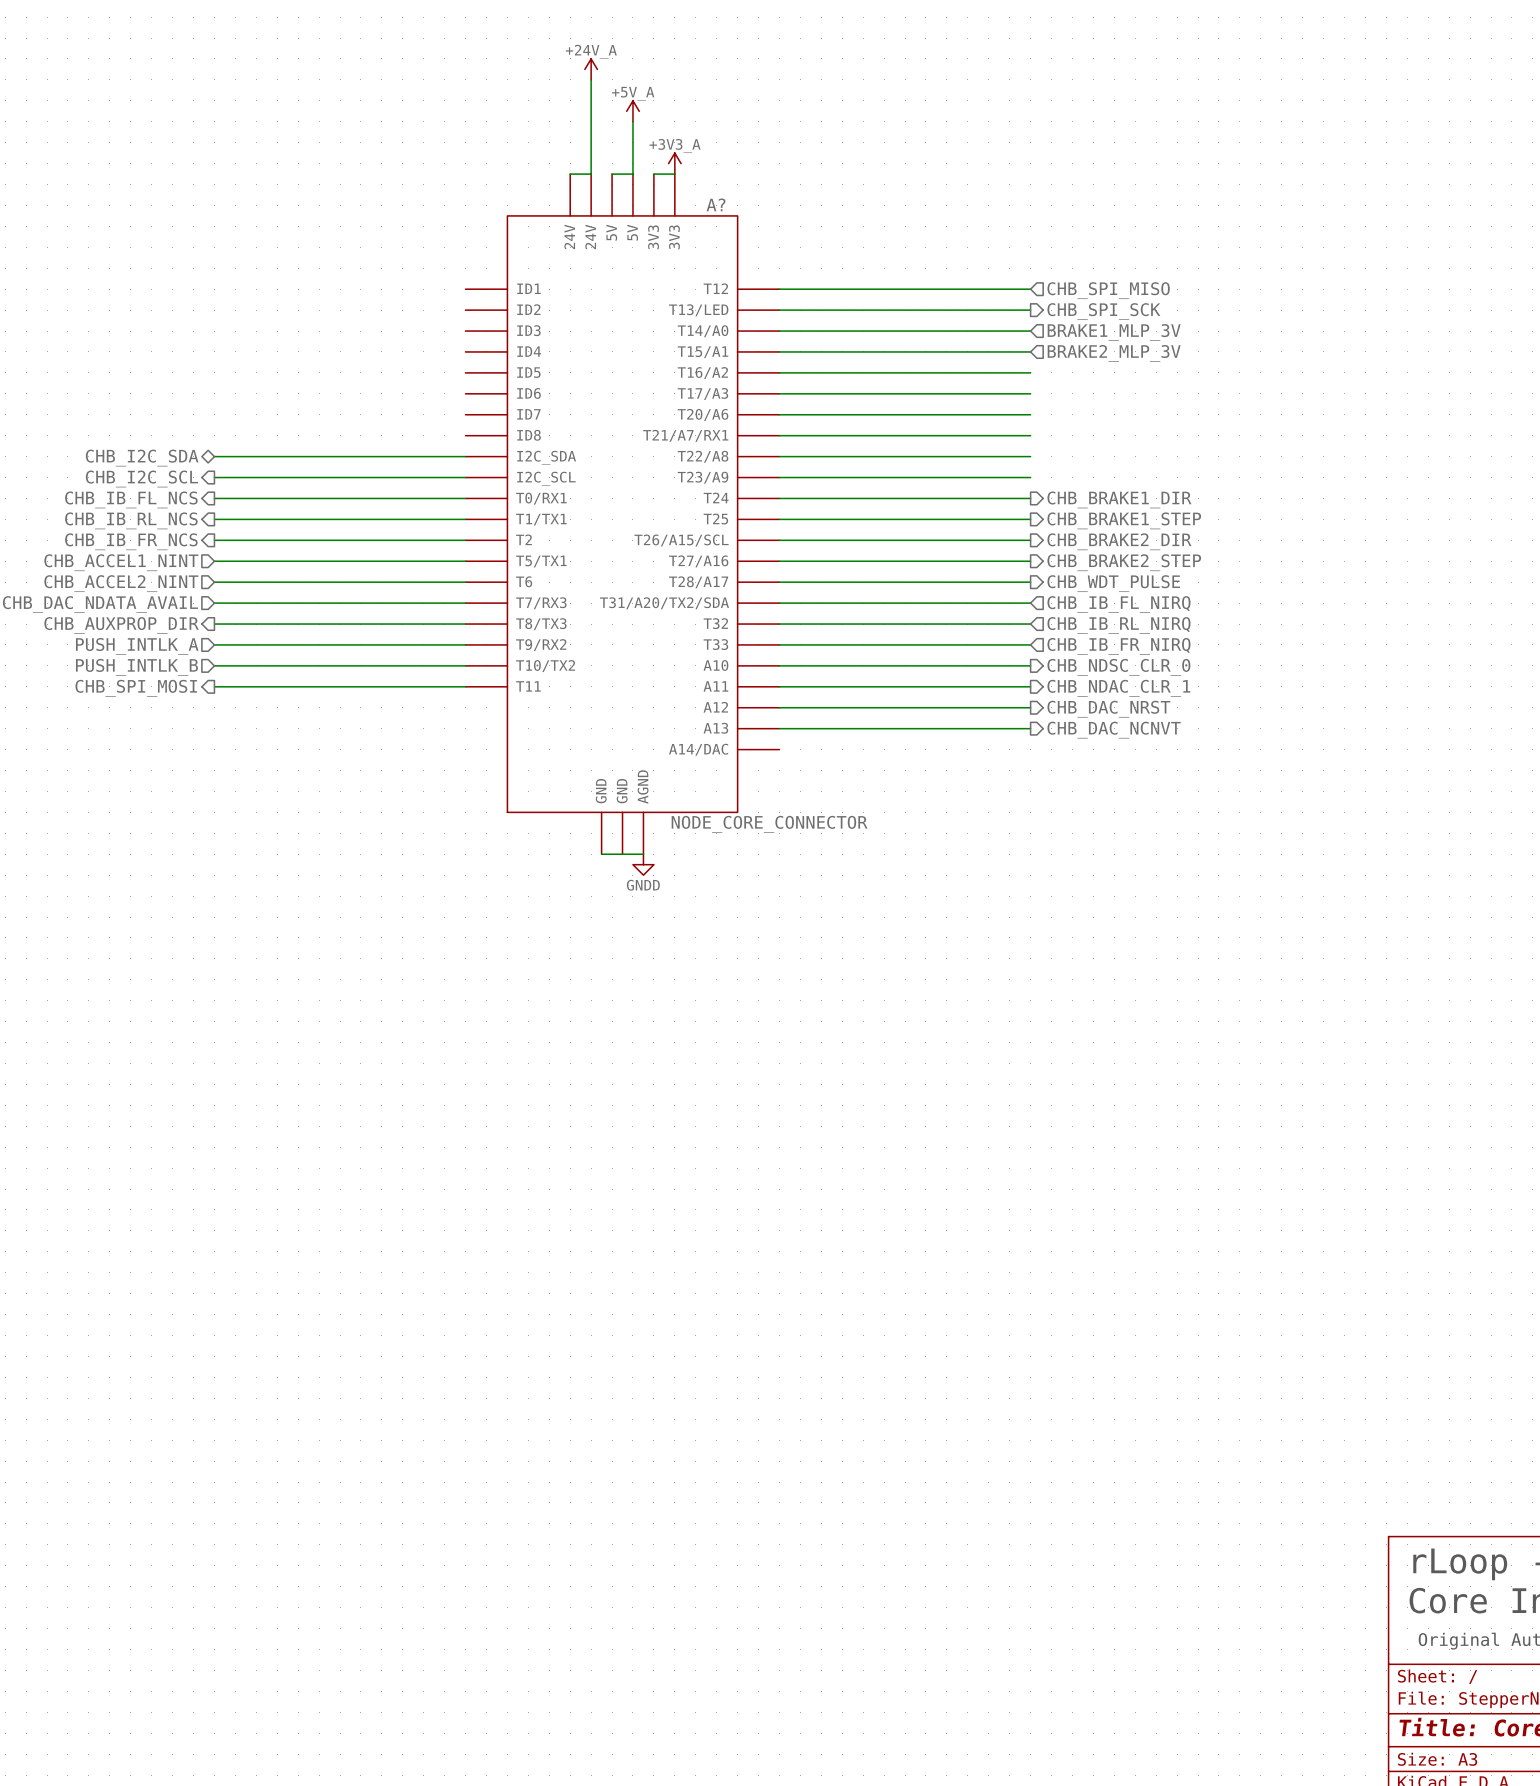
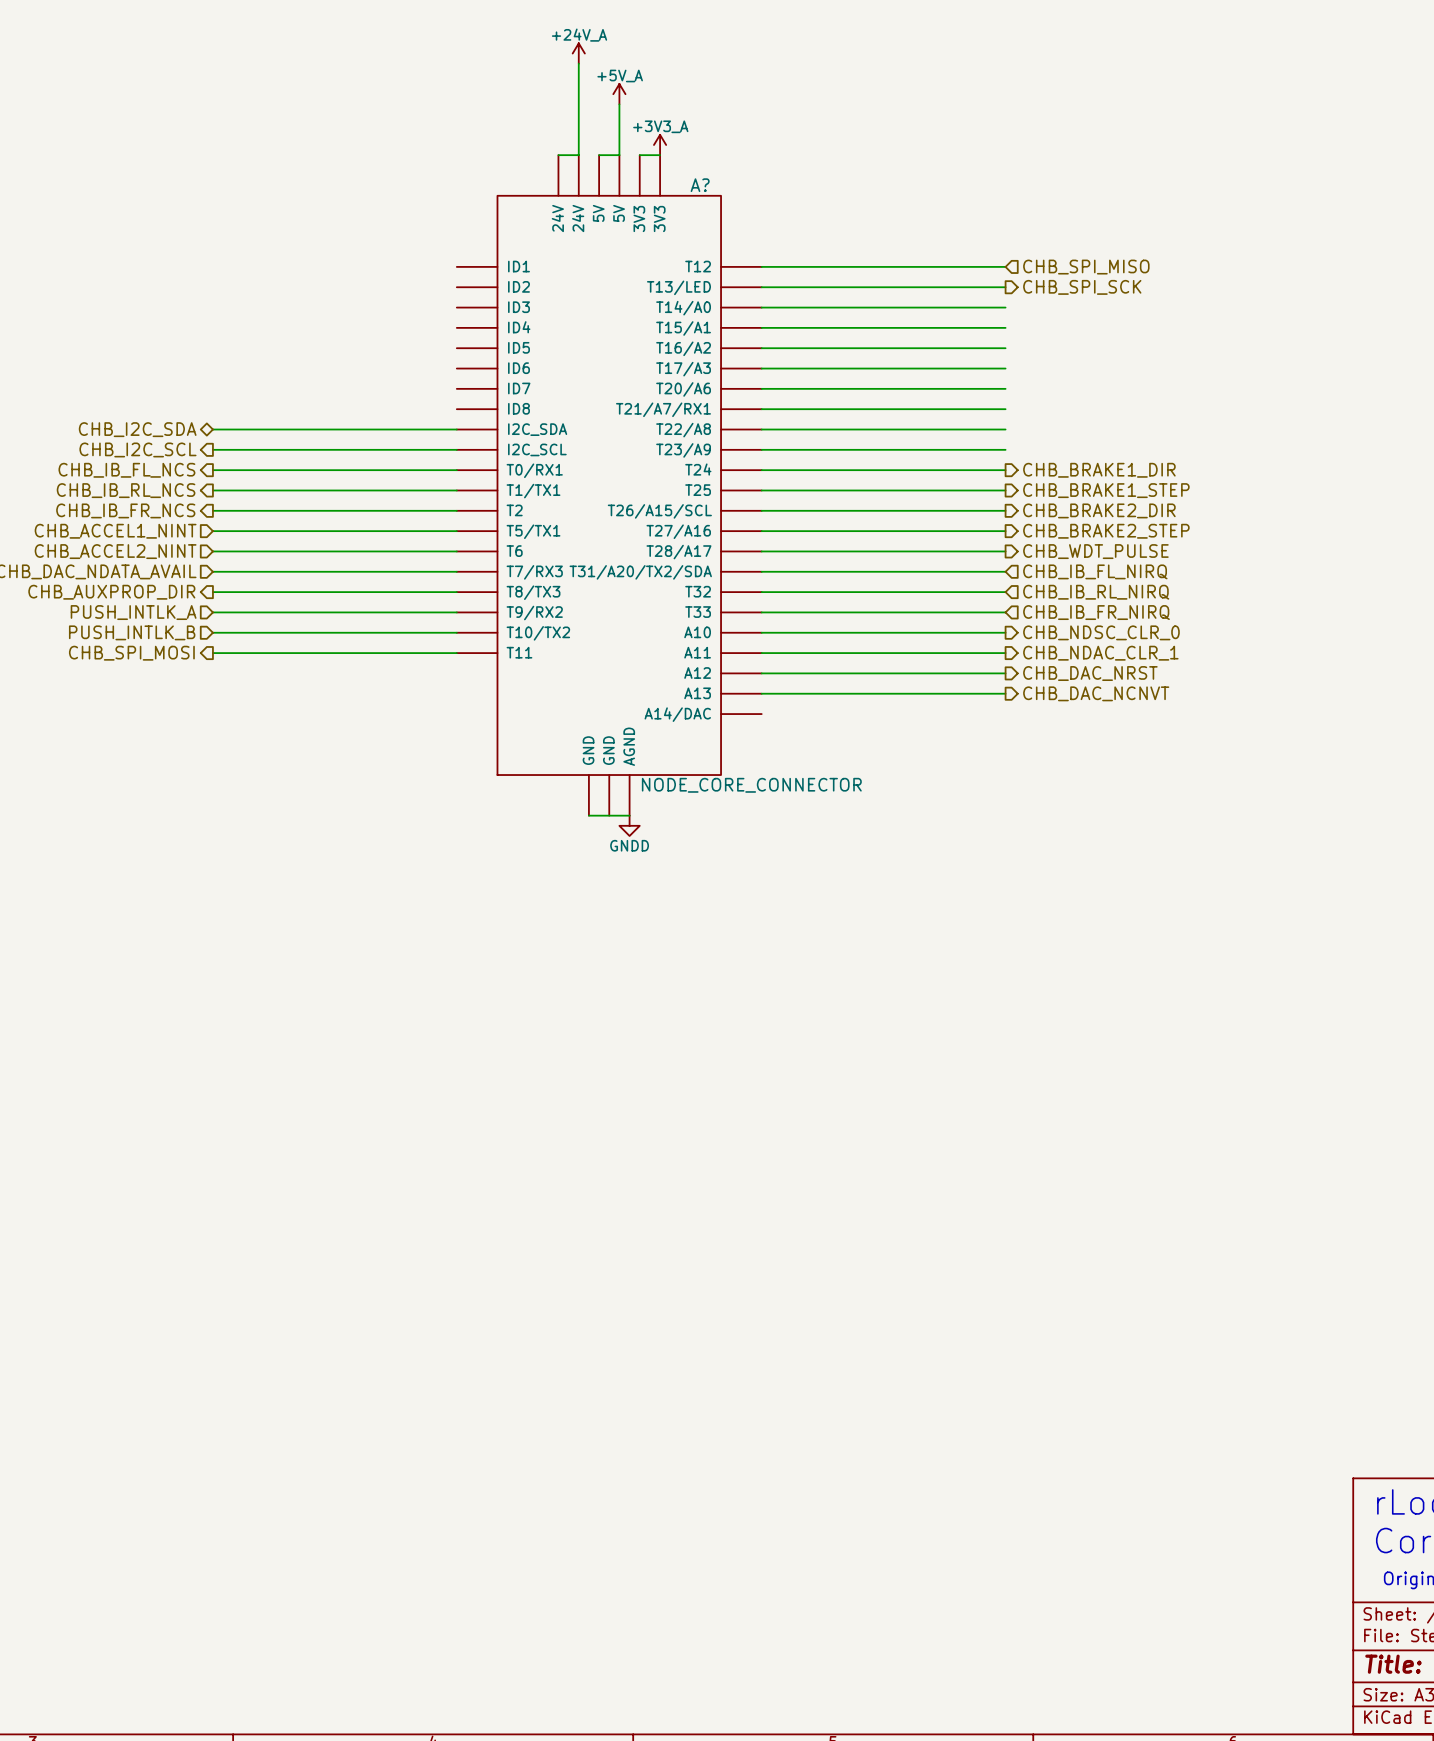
hierarchical label: BRAKE1_MLP_3V (1114, 332) -> none
hierarchical label: BRAKE2_MLP_3V (1114, 353) -> none

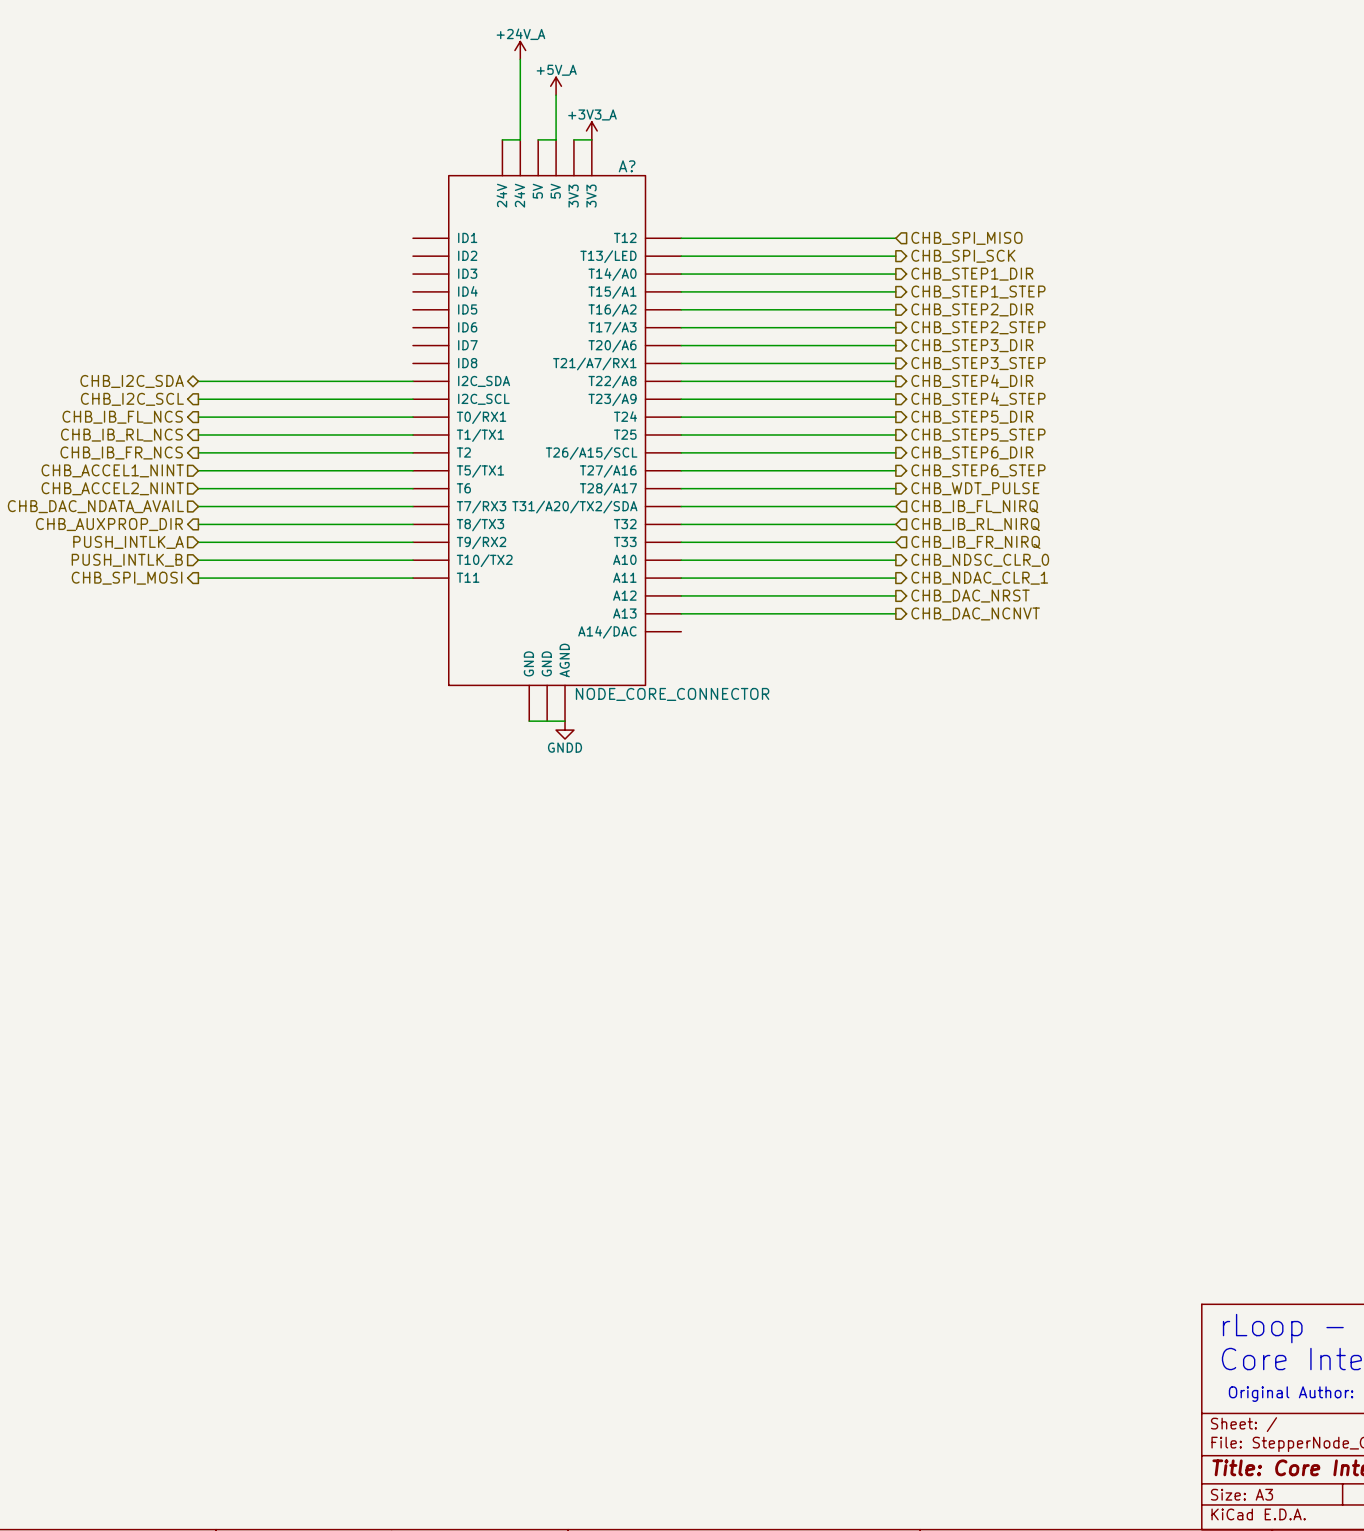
hierarchical label: none -> CHB_STEP1_DIR (972, 274)
hierarchical label: none -> CHB_STEP1_STEP (978, 292)
hierarchical label: none -> CHB_STEP2_DIR (972, 309)
hierarchical label: none -> CHB_STEP2_STEP (978, 327)
hierarchical label: none -> CHB_STEP3_DIR (972, 345)
hierarchical label: none -> CHB_STEP3_STEP (978, 363)
hierarchical label: none -> CHB_STEP4_DIR (972, 381)
hierarchical label: none -> CHB_STEP4_STEP (978, 399)
hierarchical label: CHB_BRAKE1_DIR (1099, 470) -> CHB_STEP5_DIR (972, 417)
hierarchical label: CHB_BRAKE1_STEP (1106, 490) -> CHB_STEP5_STEP (978, 435)
hierarchical label: CHB_BRAKE2_DIR (1099, 510) -> CHB_STEP6_DIR (972, 452)
hierarchical label: CHB_BRAKE2_STEP (1106, 531) -> CHB_STEP6_STEP (978, 470)

